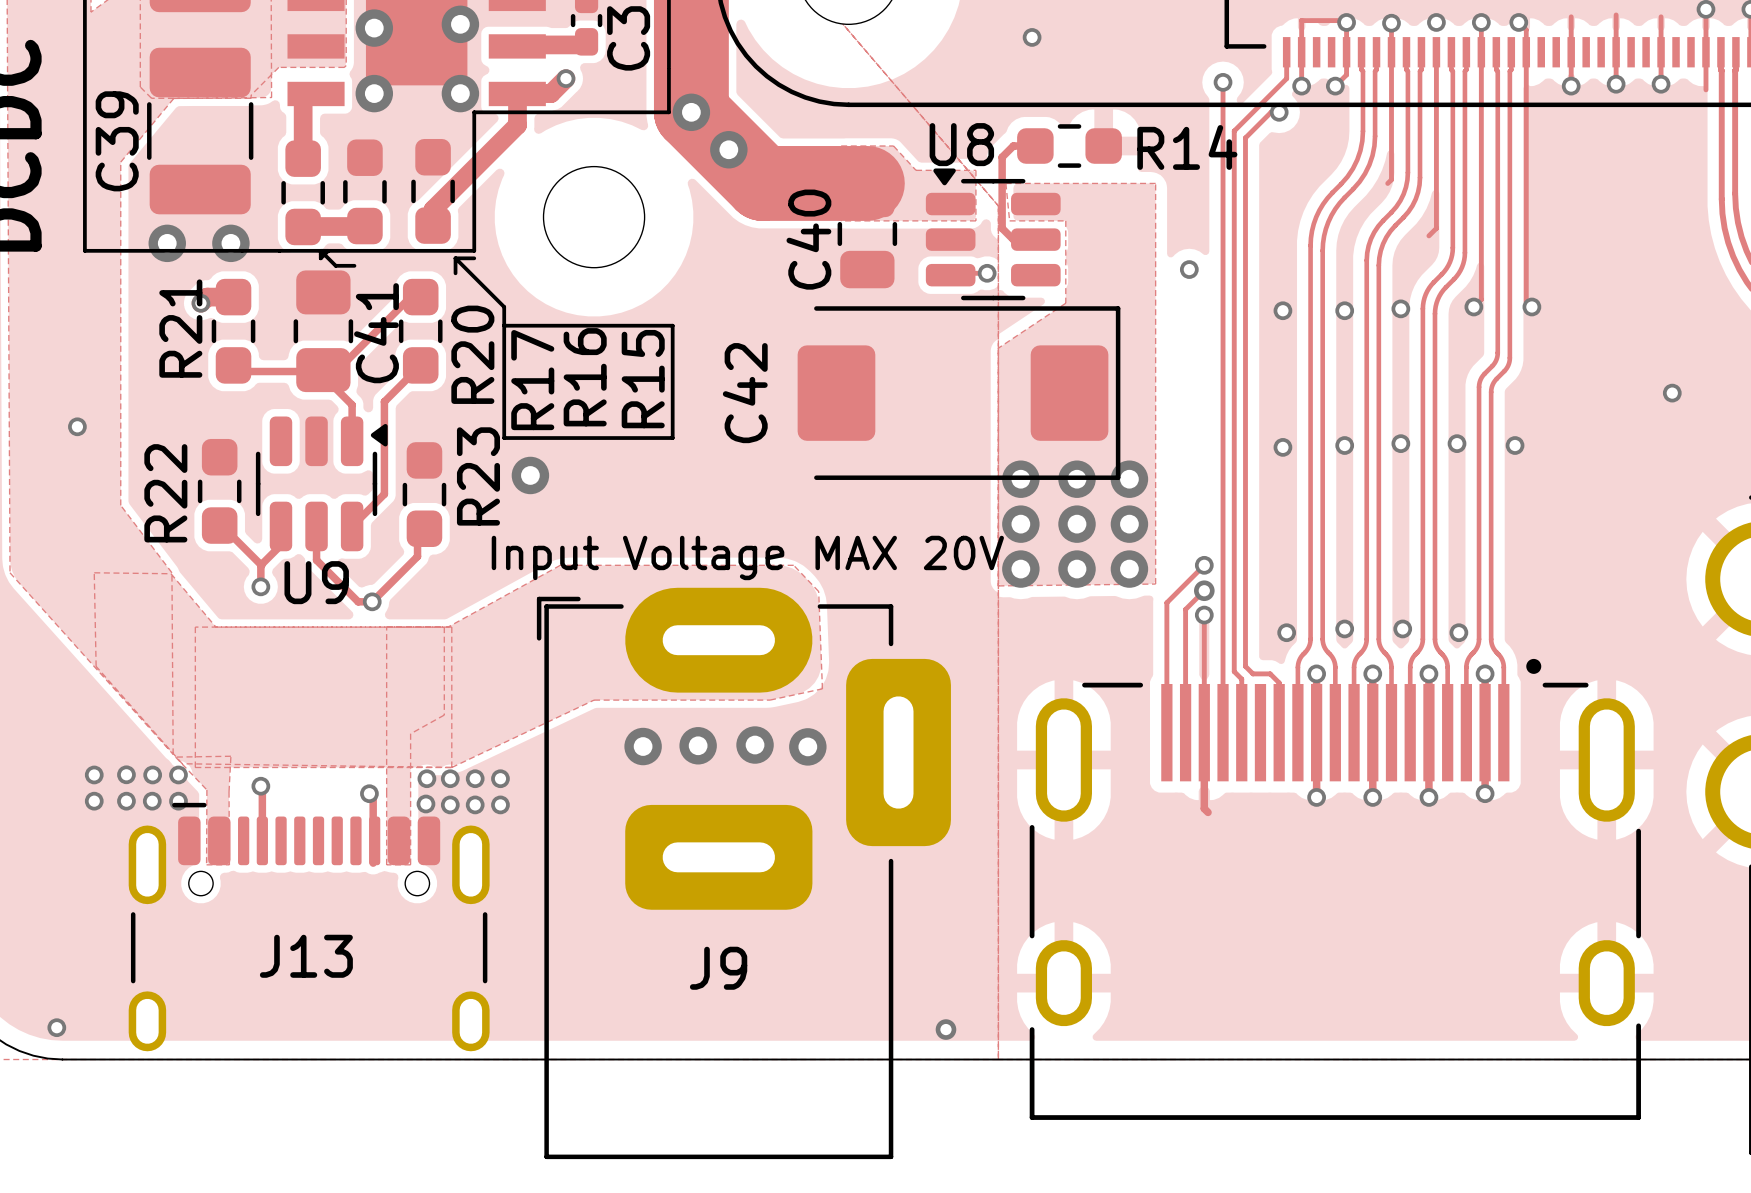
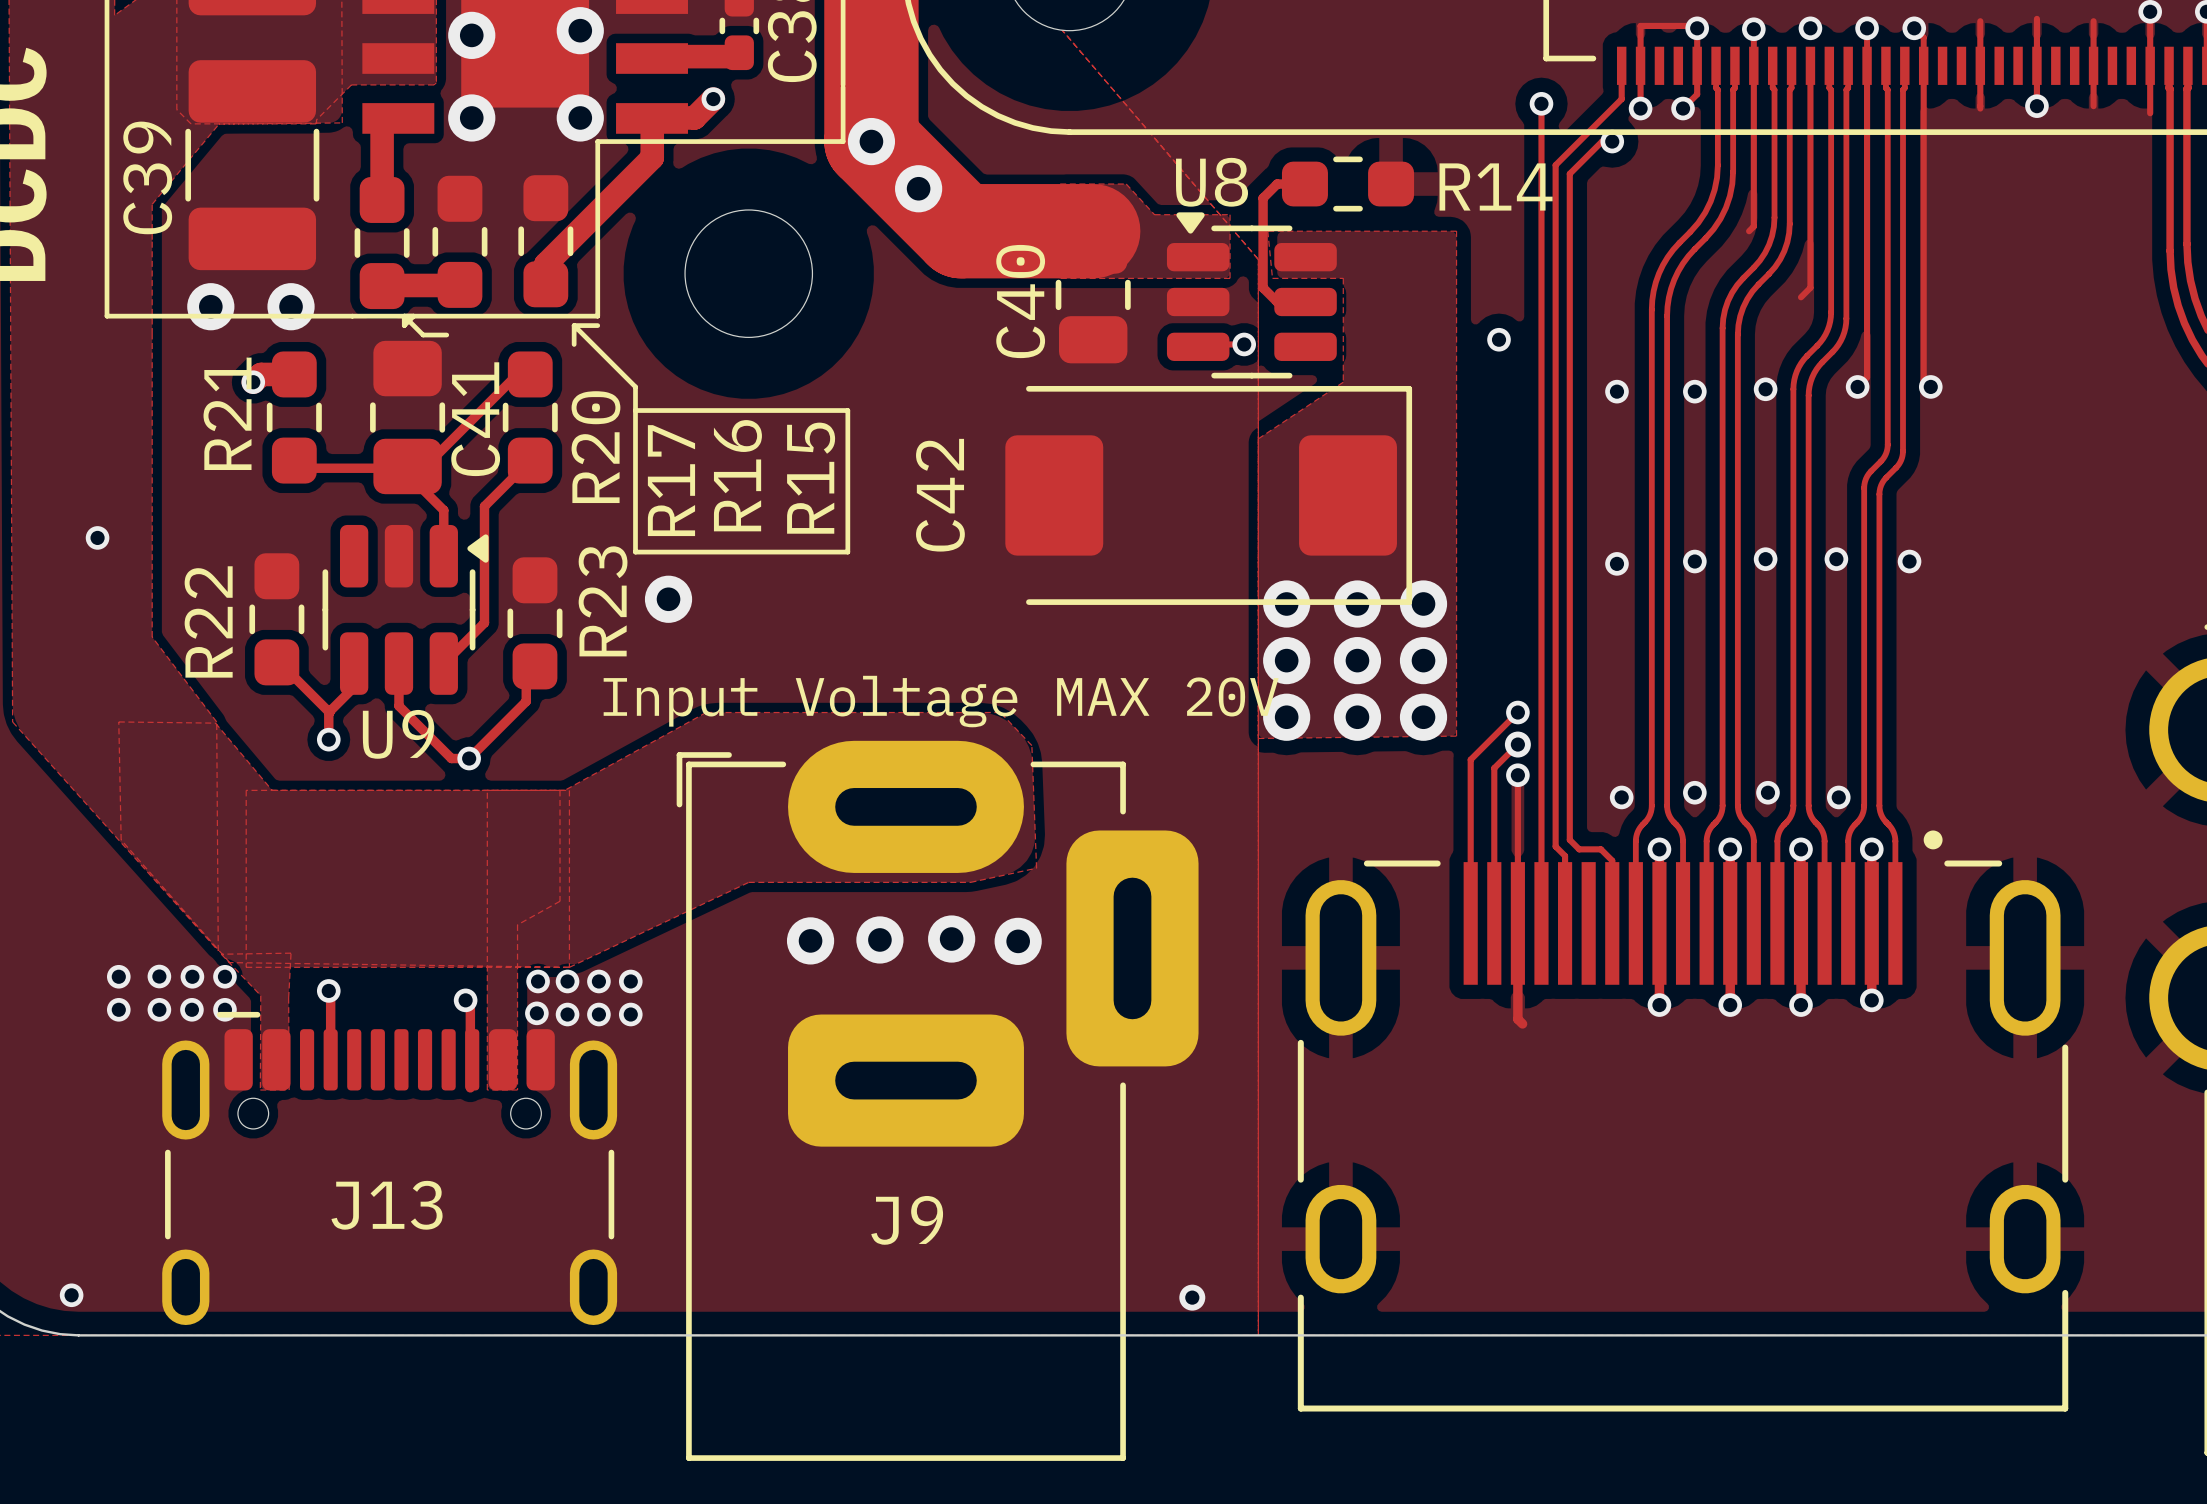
via: (1032, 37) -> none
via: (1661, 84) -> none
via: (1571, 86) -> none
via: (1672, 393) -> none

